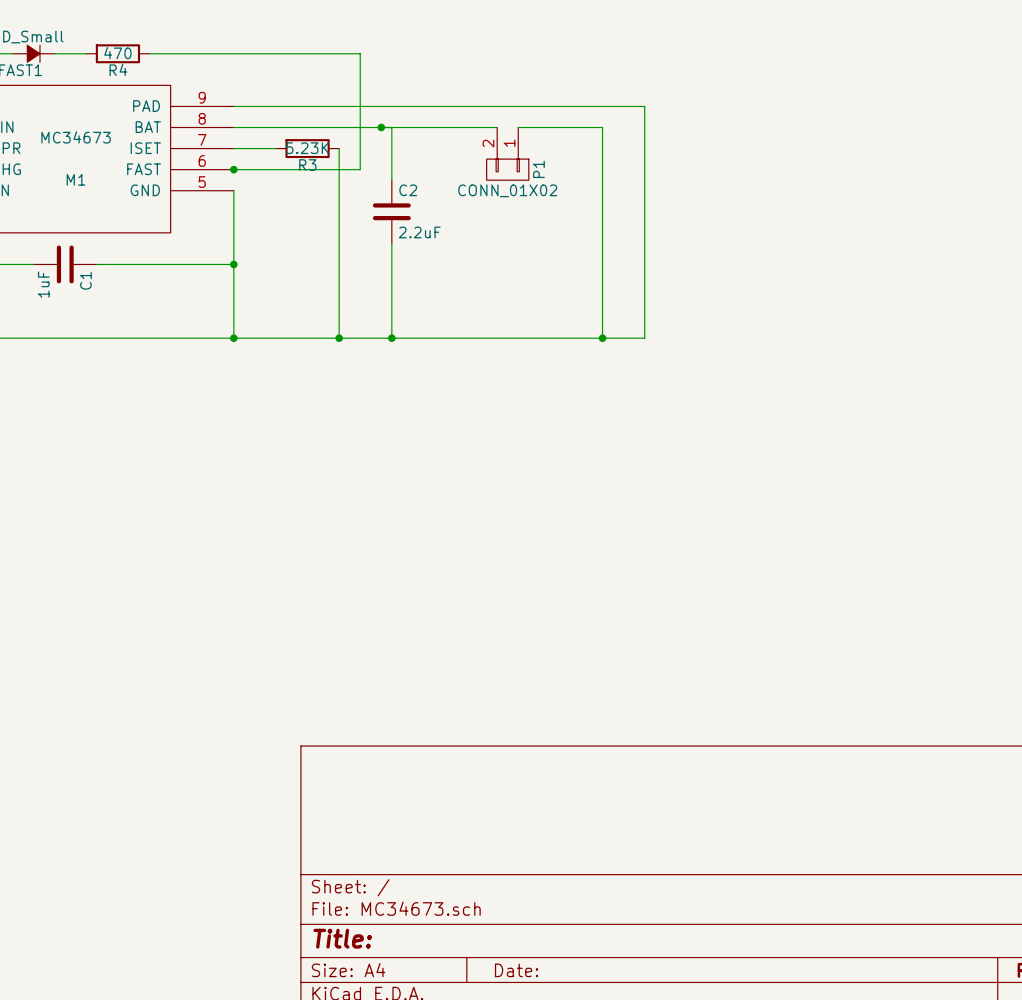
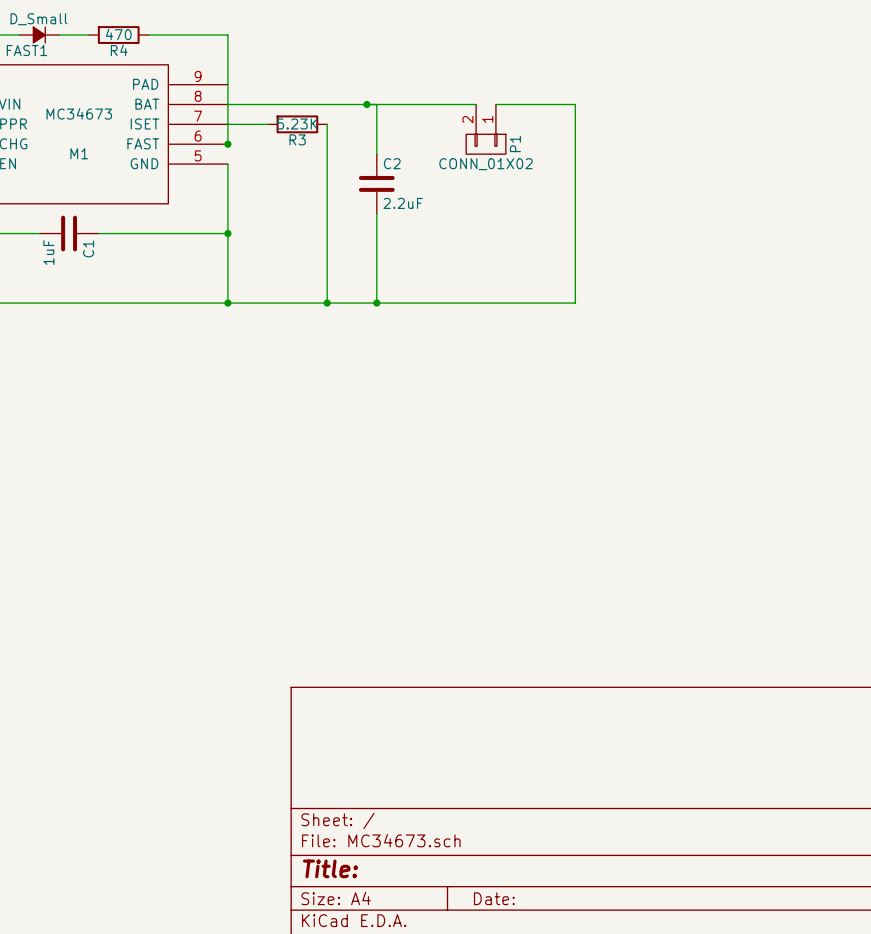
wire: (233, 53) (360, 53) (360, 169) (233, 169) -> (227, 35) (227, 144)
wire: (233, 106) (644, 106) (644, 338) (602, 338) -> none
junction: (602, 338) -> none

